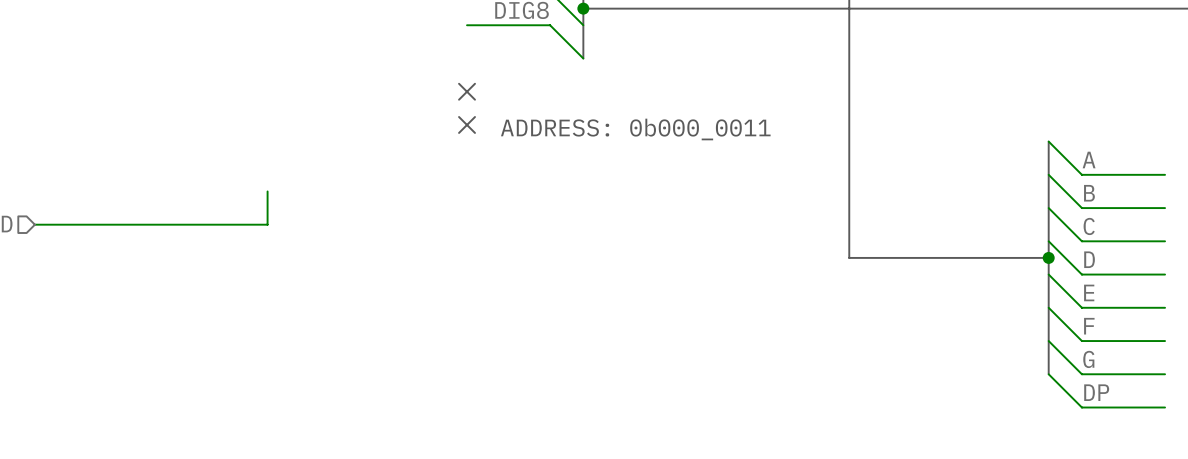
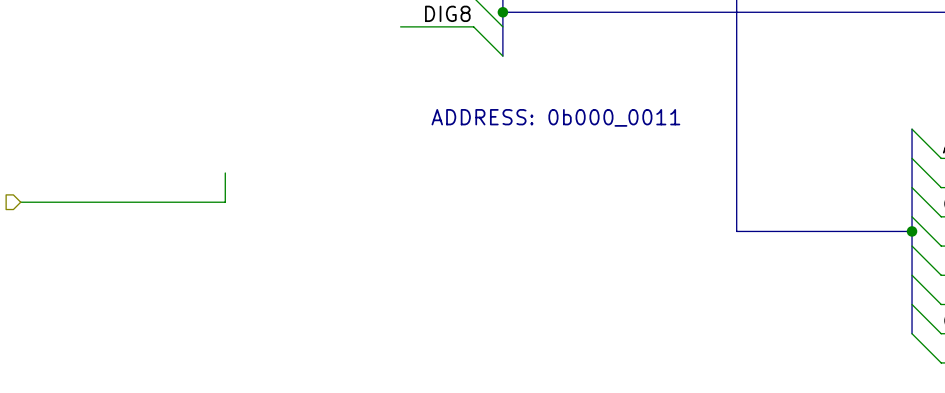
no-connect mark: (467, 91) -> none
no-connect mark: (467, 124) -> none

